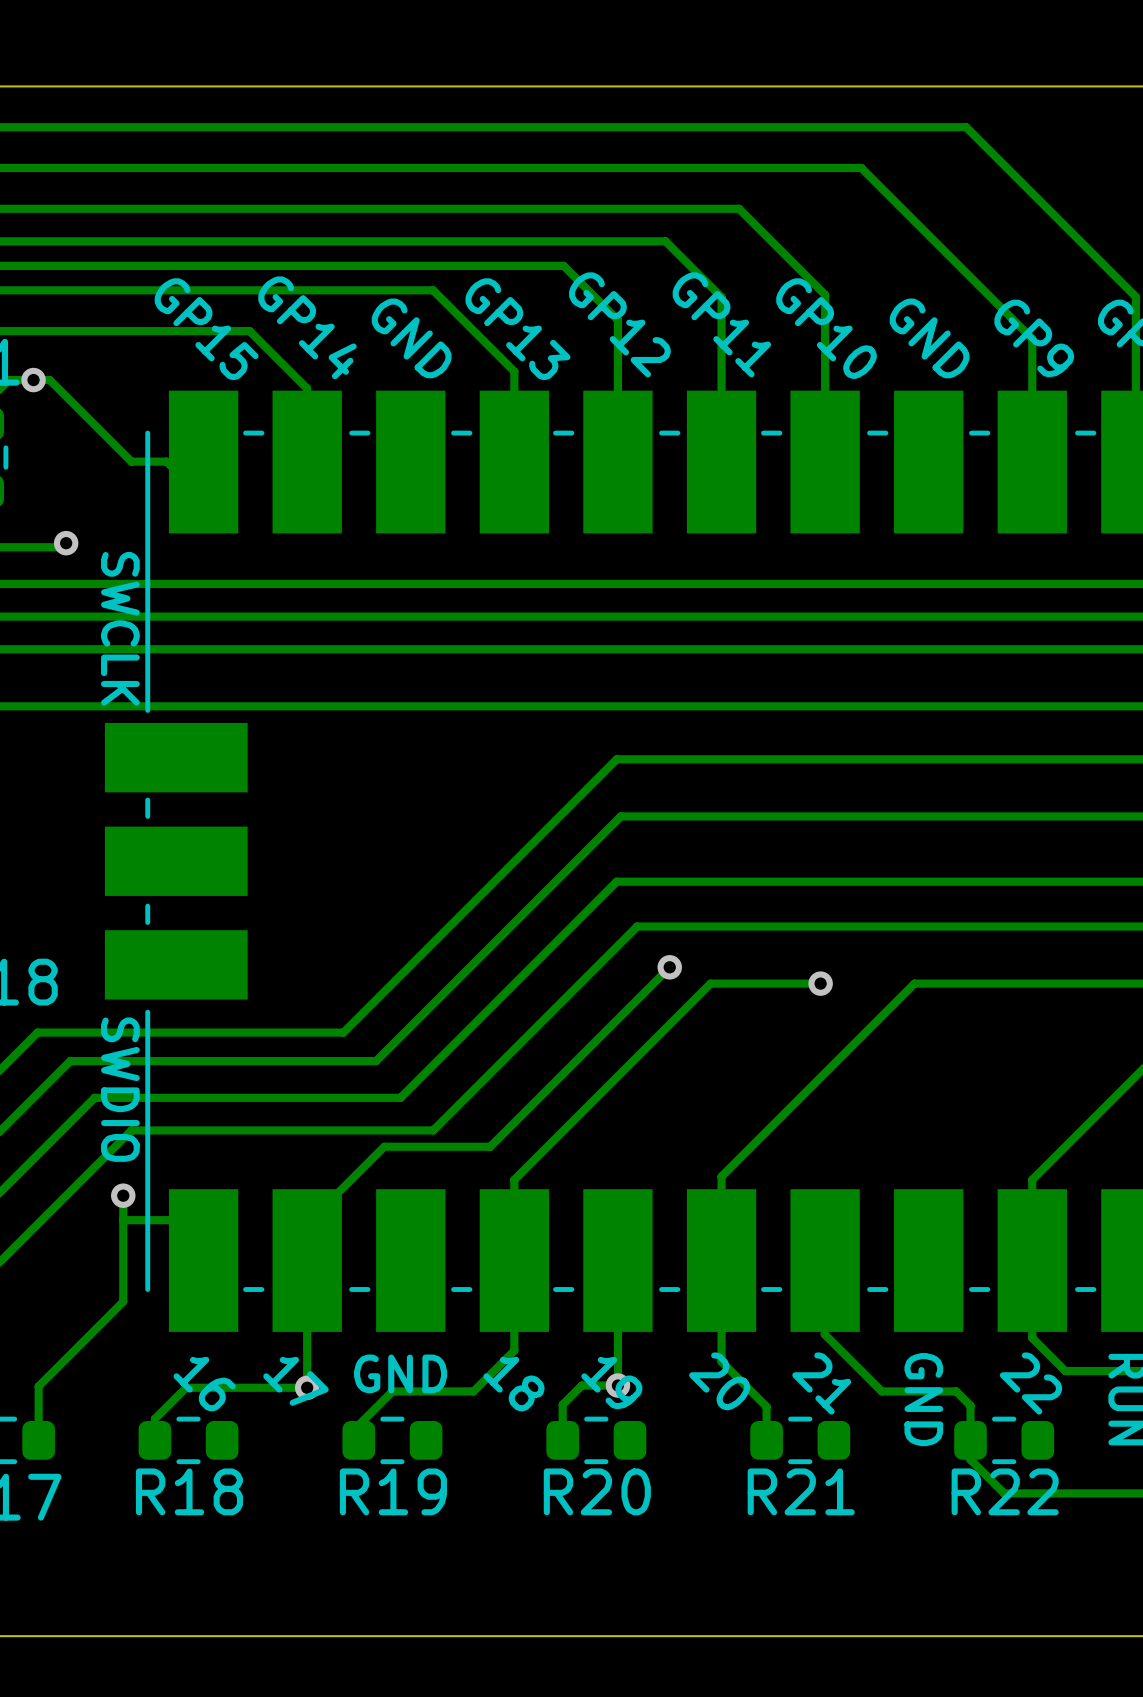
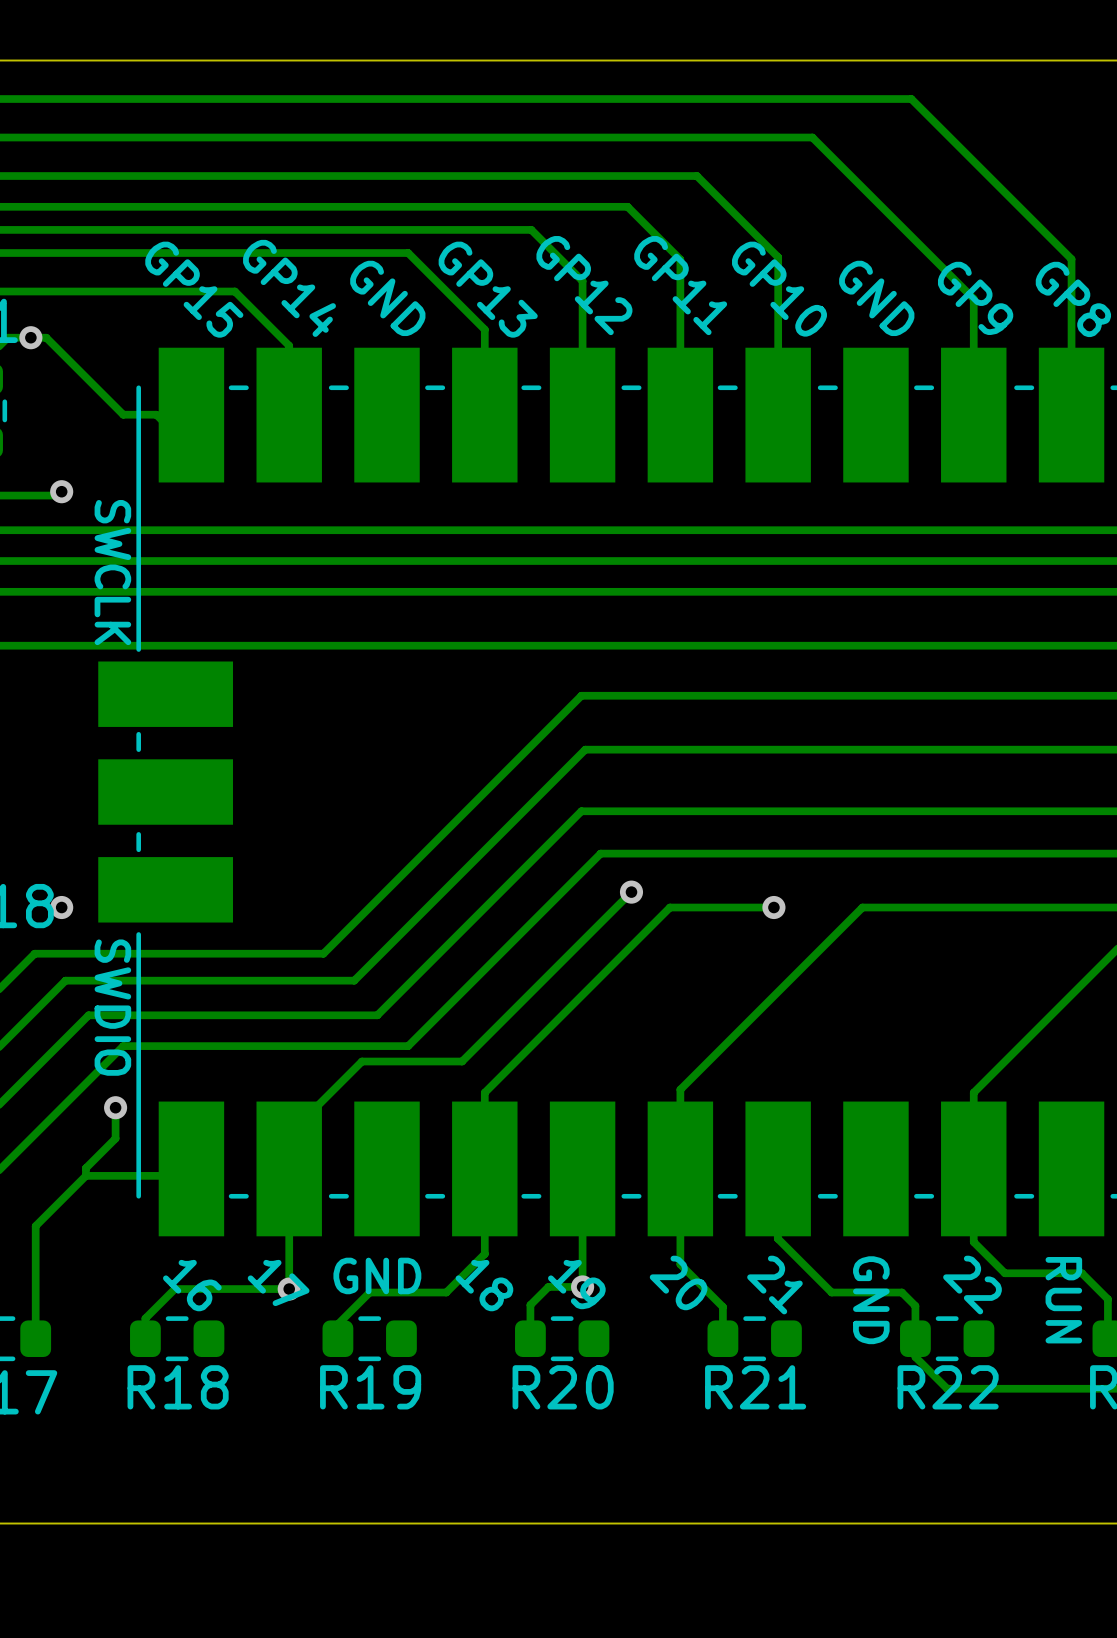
via: none -> (61, 907)
track: (123, 1220) (199, 1220) (203, 1223) -> (85, 1175) (191, 1175) (191, 1134)
track: (123, 1228) (123, 1301) (38, 1386) -> (85, 1175) (35, 1226) (35, 1287)
track: none -> (115, 1138) (85, 1168) (85, 1175)

